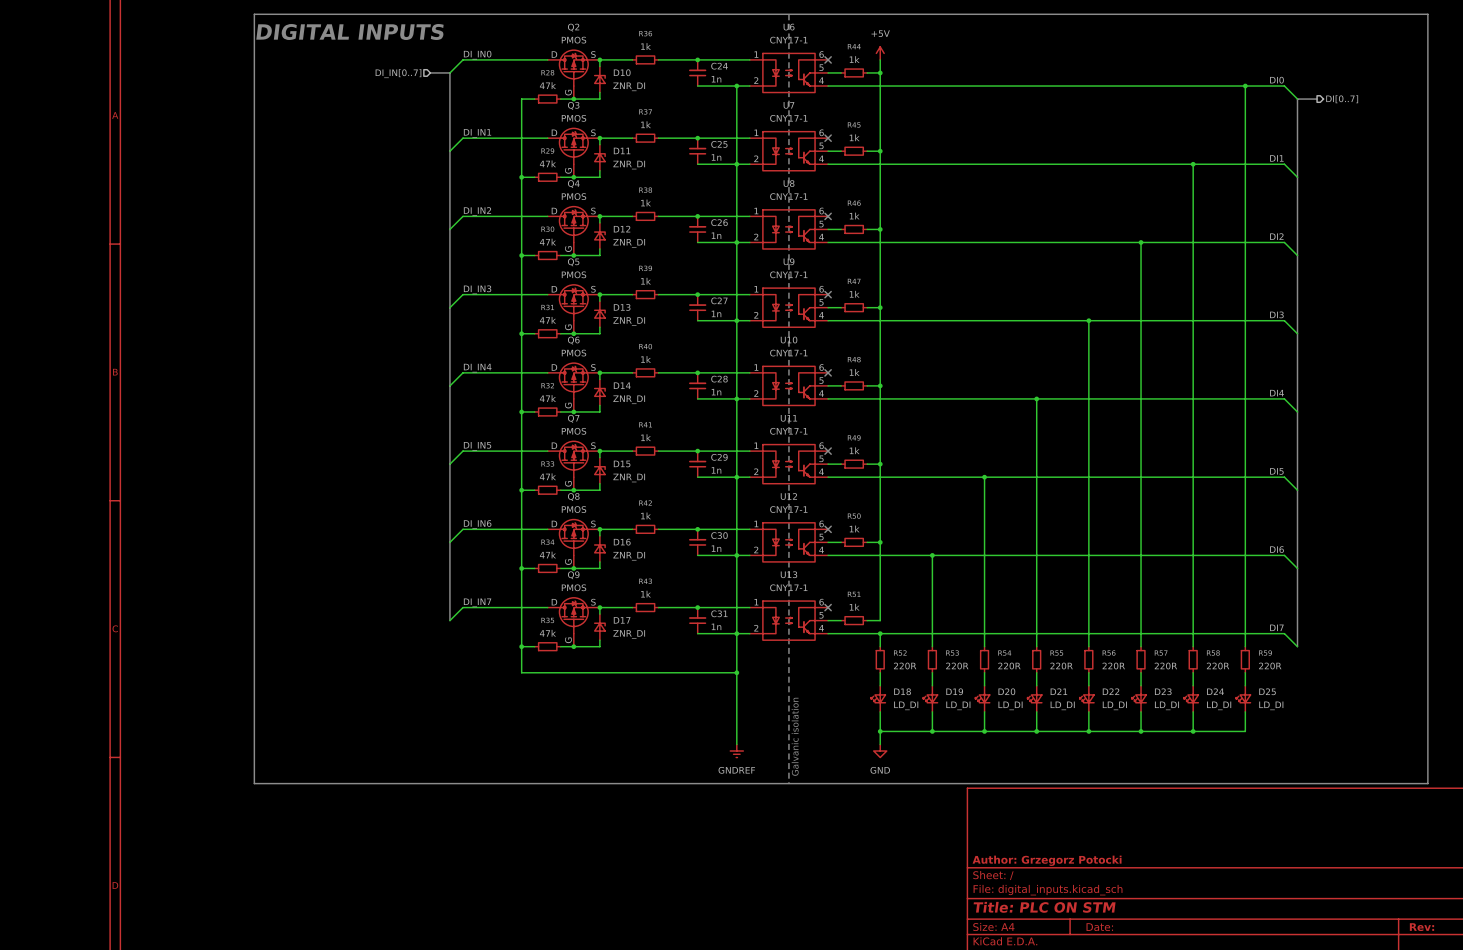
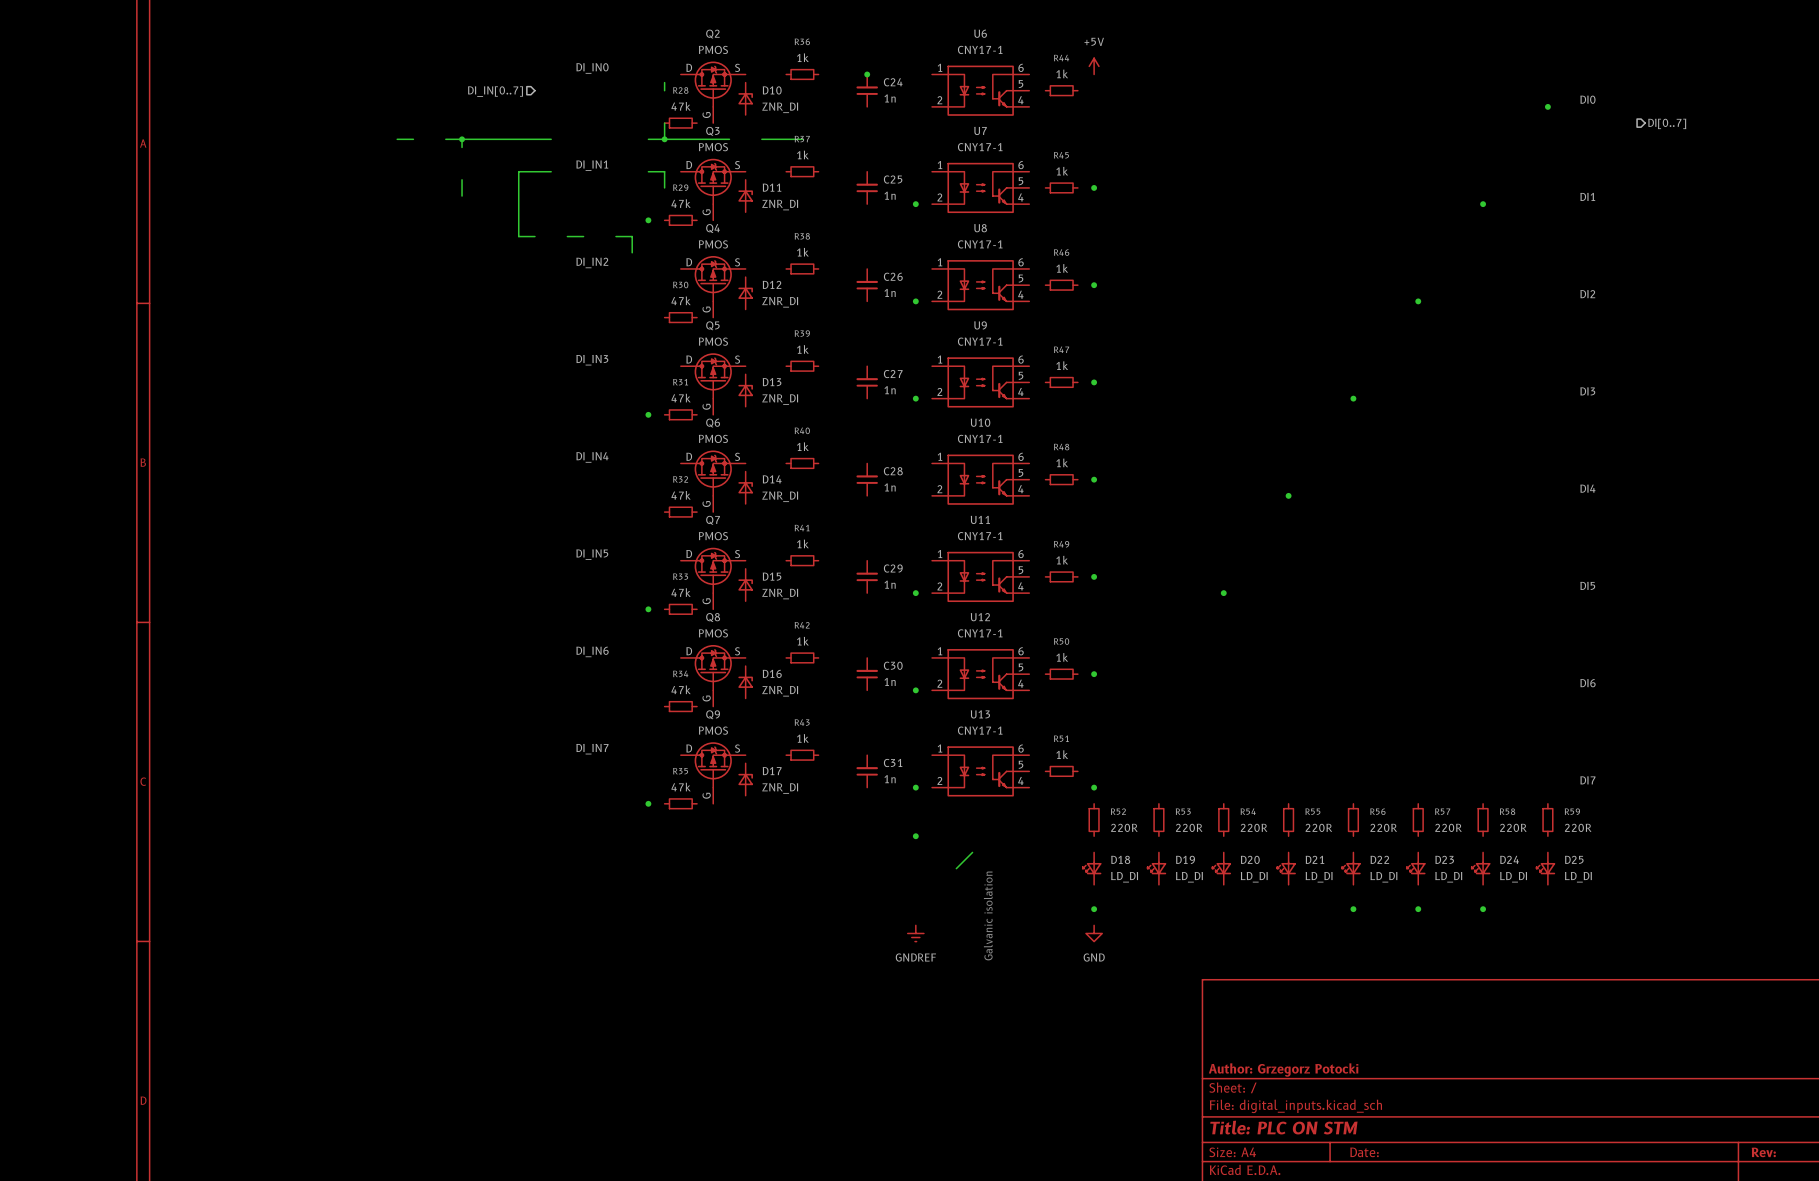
line: (254, 14) (1427, 14) (1427, 783) (254, 783) (254, 14) -> none
line: (788, 14) (788, 783) -> none
text: DIGITAL INPUTS (349, 32) -> none
wire: (547, 59) (462, 59) (449, 72) -> none
junction: (599, 59) -> none
wire: (632, 59) (599, 59) (599, 66) -> none
wire: (658, 59) (749, 59) -> none
no-connect mark: (828, 59) -> none
wire: (880, 59) (880, 620) (867, 620) -> none
wire: none -> (664, 82) (664, 90)
bus: (430, 72) (449, 72) (449, 620) -> none
wire: (828, 72) (841, 72) -> none
wire: (867, 72) (880, 72) -> none
junction: (880, 72) -> none
wire: (697, 86) (749, 86) -> none
wire: (736, 86) (736, 744) -> none
junction: (736, 86) -> none
wire: (828, 86) (1284, 86) (1297, 99) -> none
wire: (1245, 86) (1245, 646) -> none
wire: (599, 92) (599, 99) (560, 99) -> none
wire: (534, 99) (521, 99) (521, 672) (736, 672) -> (664, 123) (664, 139)
junction: (573, 99) -> none
bus: (1317, 99) (1297, 99) (1297, 646) -> none
wire: none -> (397, 139) (413, 139)
wire: none -> (445, 139) (551, 139)
wire: none -> (462, 139) (462, 147)
junction: none -> (462, 139)
wire: none -> (648, 139) (729, 139)
junction: none -> (664, 139)
wire: none -> (761, 139) (802, 139)
wire: none -> (551, 171) (518, 171) (518, 236) (534, 236)
wire: (521, 138) (462, 138) (449, 151) -> none
wire: (534, 138) (547, 138) -> (664, 171) (664, 187)
junction: (599, 138) -> none
wire: (632, 138) (599, 138) (599, 144) -> none
wire: (658, 138) (749, 138) -> none
junction: (697, 138) -> none
no-connect mark: (828, 138) -> none
wire: none -> (462, 179) (462, 196)
wire: (828, 151) (841, 151) -> none
wire: (867, 151) (880, 151) -> none
wire: (697, 164) (749, 164) -> none
wire: (828, 164) (1284, 164) (1297, 177) -> none
wire: (1193, 164) (1193, 646) -> none
wire: (599, 170) (599, 177) (560, 177) -> none
wire: (521, 177) (534, 177) -> (567, 236) (583, 236)
junction: (573, 177) -> none
wire: none -> (615, 236) (632, 236) (632, 252)
wire: (547, 216) (462, 216) (449, 229) -> none
junction: (599, 216) -> none
wire: (632, 216) (599, 216) (599, 222) -> none
wire: (658, 216) (749, 216) -> none
junction: (697, 216) -> none
no-connect mark: (828, 216) -> none
wire: (828, 229) (841, 229) -> none
wire: (867, 229) (880, 229) -> none
wire: (697, 242) (749, 242) -> none
wire: (828, 242) (1284, 242) (1297, 255) -> none
wire: (1141, 242) (1141, 646) -> none
wire: (599, 248) (599, 255) (560, 255) -> none
wire: (521, 255) (534, 255) -> none
junction: (521, 255) -> none
junction: (573, 255) -> none
wire: (547, 294) (462, 294) (449, 307) -> none
junction: (599, 294) -> none
wire: (632, 294) (599, 294) (599, 301) -> none
wire: (658, 294) (749, 294) -> none
junction: (697, 294) -> none
no-connect mark: (828, 294) -> none
wire: (828, 307) (841, 307) -> none
wire: (867, 307) (880, 307) -> none
wire: (697, 320) (749, 320) -> none
wire: (828, 320) (1284, 320) (1297, 333) -> none
wire: (1088, 320) (1088, 646) -> none
wire: (599, 327) (599, 333) (560, 333) -> none
wire: (521, 333) (534, 333) -> none
junction: (573, 333) -> none
wire: (547, 372) (462, 372) (449, 385) -> none
junction: (599, 372) -> none
wire: (632, 372) (599, 372) (599, 379) -> none
wire: (658, 372) (749, 372) -> none
junction: (697, 372) -> none
no-connect mark: (828, 372) -> none
wire: (828, 385) (841, 385) -> none
wire: (867, 385) (880, 385) -> none
wire: (697, 398) (749, 398) -> none
junction: (736, 398) -> none
wire: (828, 398) (1284, 398) (1297, 411) -> none
wire: (1036, 398) (1036, 646) -> none
wire: (599, 405) (599, 411) (560, 411) -> none
wire: (521, 411) (534, 411) -> none
junction: (521, 411) -> none
junction: (573, 411) -> none
wire: (547, 451) (462, 451) (449, 464) -> none
junction: (599, 451) -> none
wire: (632, 451) (599, 451) (599, 457) -> none
wire: (658, 451) (749, 451) -> none
junction: (697, 451) -> none
no-connect mark: (828, 451) -> none
wire: (828, 464) (841, 464) -> none
wire: (867, 464) (880, 464) -> none
wire: (697, 477) (749, 477) -> none
wire: (828, 477) (1284, 477) (1297, 490) -> none
wire: (984, 477) (984, 646) -> none
wire: (599, 483) (599, 490) (560, 490) -> none
wire: (521, 490) (534, 490) -> none
junction: (573, 490) -> none
wire: (547, 529) (462, 529) (449, 542) -> none
junction: (599, 529) -> none
wire: (632, 529) (599, 529) (599, 535) -> none
wire: (658, 529) (749, 529) -> none
junction: (697, 529) -> none
no-connect mark: (828, 529) -> none
wire: (828, 542) (841, 542) -> none
wire: (867, 542) (880, 542) -> none
wire: (697, 555) (749, 555) -> none
wire: (828, 555) (1284, 555) (1297, 568) -> none
wire: (932, 555) (932, 646) -> none
junction: (932, 555) -> none
wire: (599, 561) (599, 568) (560, 568) -> none
wire: (521, 568) (534, 568) -> none
junction: (521, 568) -> none
junction: (573, 568) -> none
wire: (547, 607) (462, 607) (449, 620) -> none
junction: (599, 607) -> none
wire: (632, 607) (599, 607) (599, 614) -> none
wire: (658, 607) (749, 607) -> none
junction: (697, 607) -> none
no-connect mark: (828, 607) -> none
wire: (828, 620) (841, 620) -> none
wire: (697, 633) (749, 633) -> none
wire: (828, 633) (1284, 633) (1297, 646) -> none
wire: (880, 633) (880, 646) -> none
wire: (599, 640) (599, 646) (560, 646) -> none
wire: (521, 646) (534, 646) -> none
junction: (573, 646) -> none
wire: (880, 672) (880, 685) -> none
wire: (932, 672) (932, 685) -> none
wire: (984, 672) (984, 685) -> none
wire: (1036, 672) (1036, 685) -> none
wire: (1088, 672) (1088, 685) -> none
wire: (1141, 672) (1141, 685) -> none
wire: (1193, 672) (1193, 685) -> none
wire: (1245, 672) (1245, 685) -> none
wire: none -> (972, 852) (956, 868)
wire: (880, 711) (880, 744) -> none
wire: (932, 711) (932, 731) -> none
wire: (984, 711) (984, 731) -> none
wire: (1036, 711) (1036, 731) -> none
wire: (1088, 711) (1088, 731) -> none
wire: (1141, 711) (1141, 731) -> none
wire: (1193, 711) (1193, 731) -> none
wire: (1245, 711) (1245, 731) (880, 731) -> none
junction: (932, 731) -> none
junction: (984, 731) -> none
junction: (1036, 731) -> none

